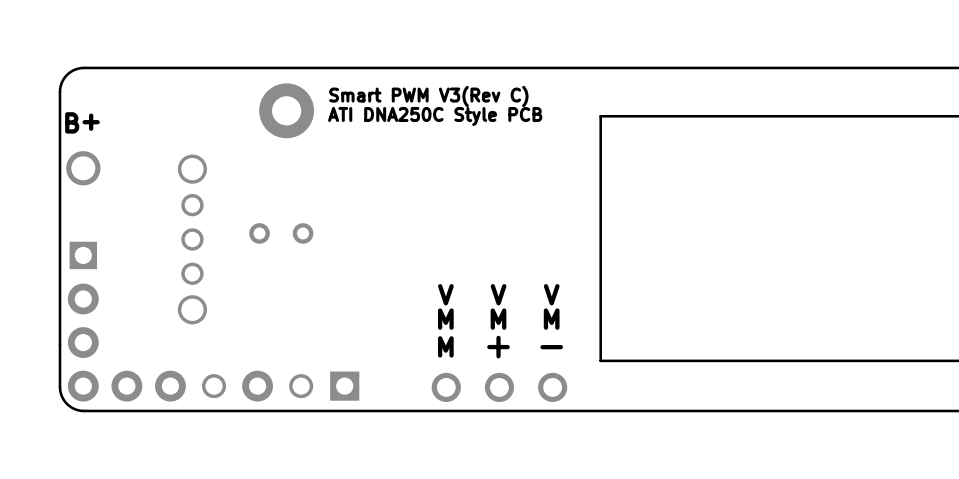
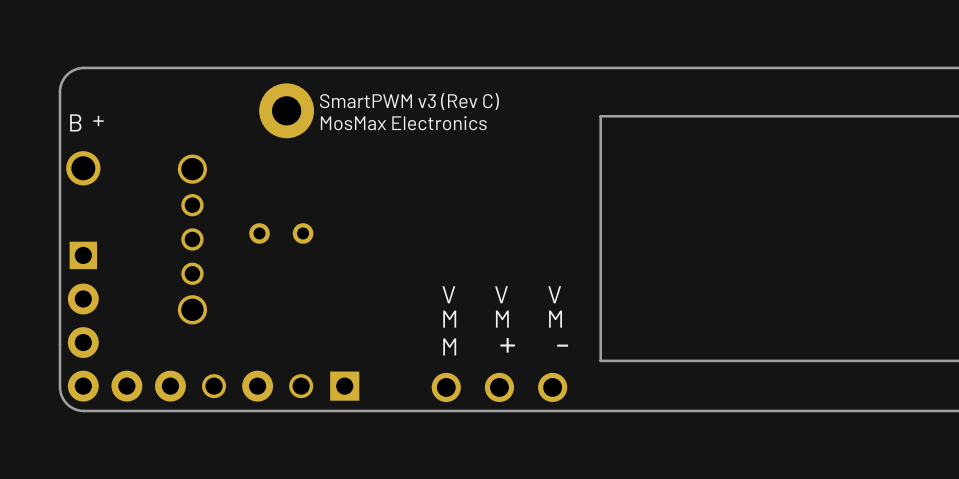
text: Smart PWM V3(Rev C) (428, 96) -> SmartPWM v3 (Rev C) (409, 101)
text: ATI DNA250C Style PCB (435, 116) -> none
text: none -> MosMax Electronics (403, 123)

